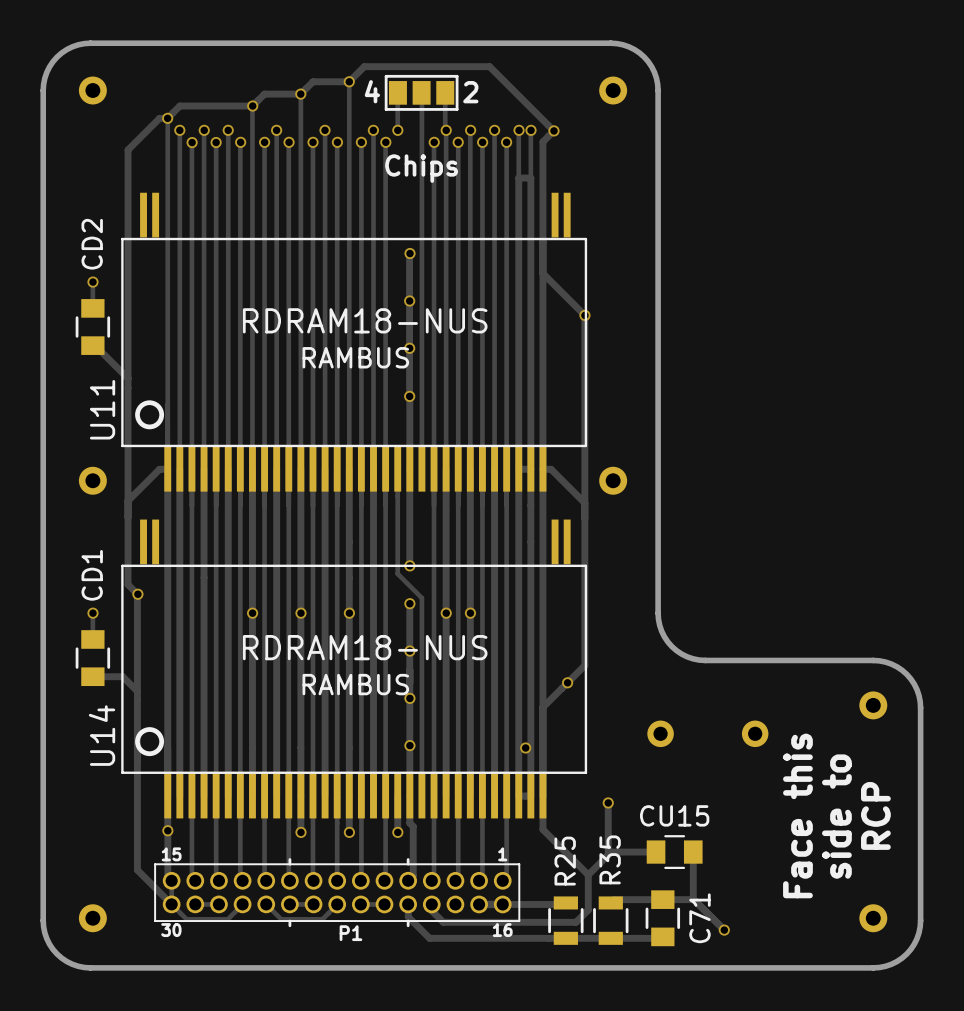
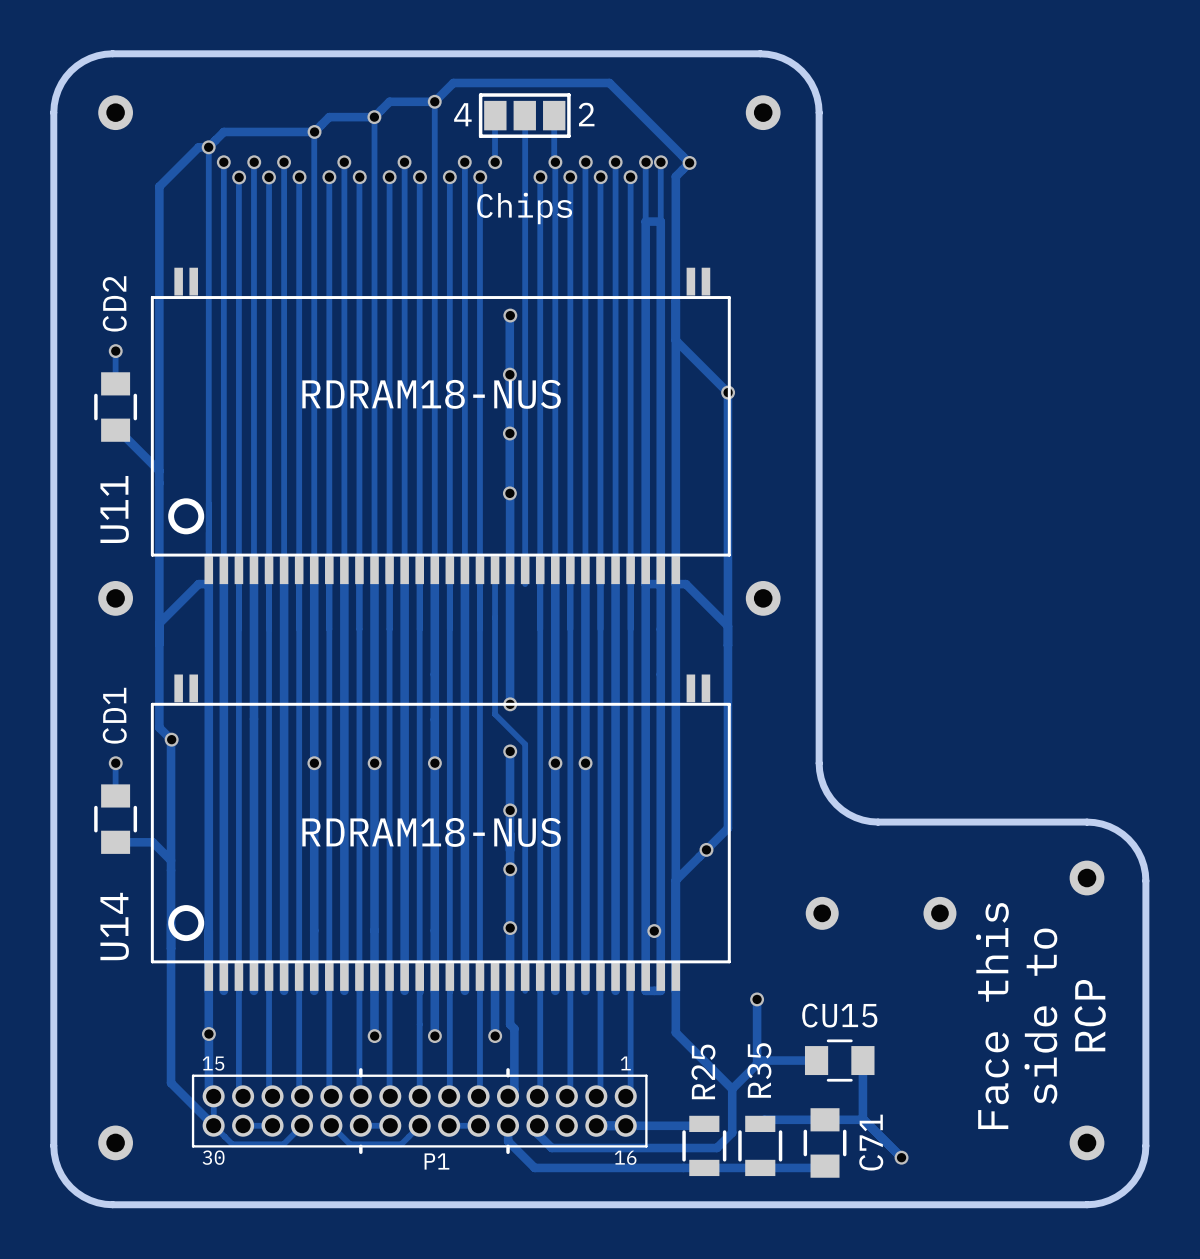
U11 footprint: [121, 192, 588, 492] -> [150, 267, 731, 585]
U14 footprint: [121, 519, 588, 819] -> [150, 674, 731, 991]

